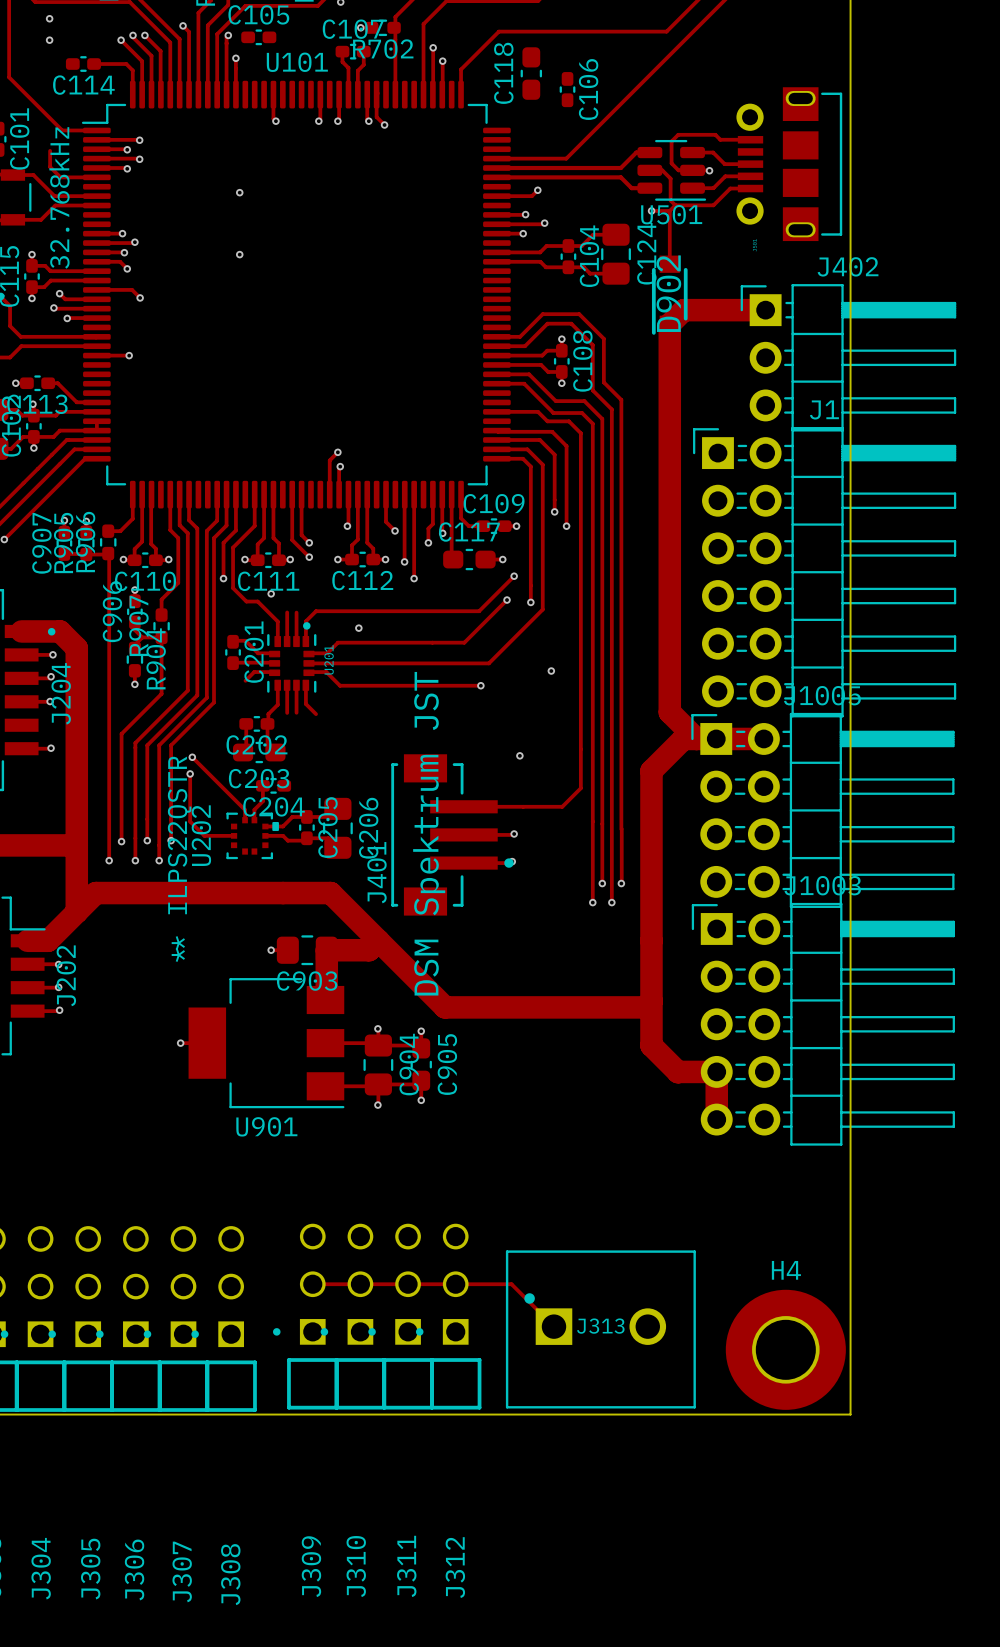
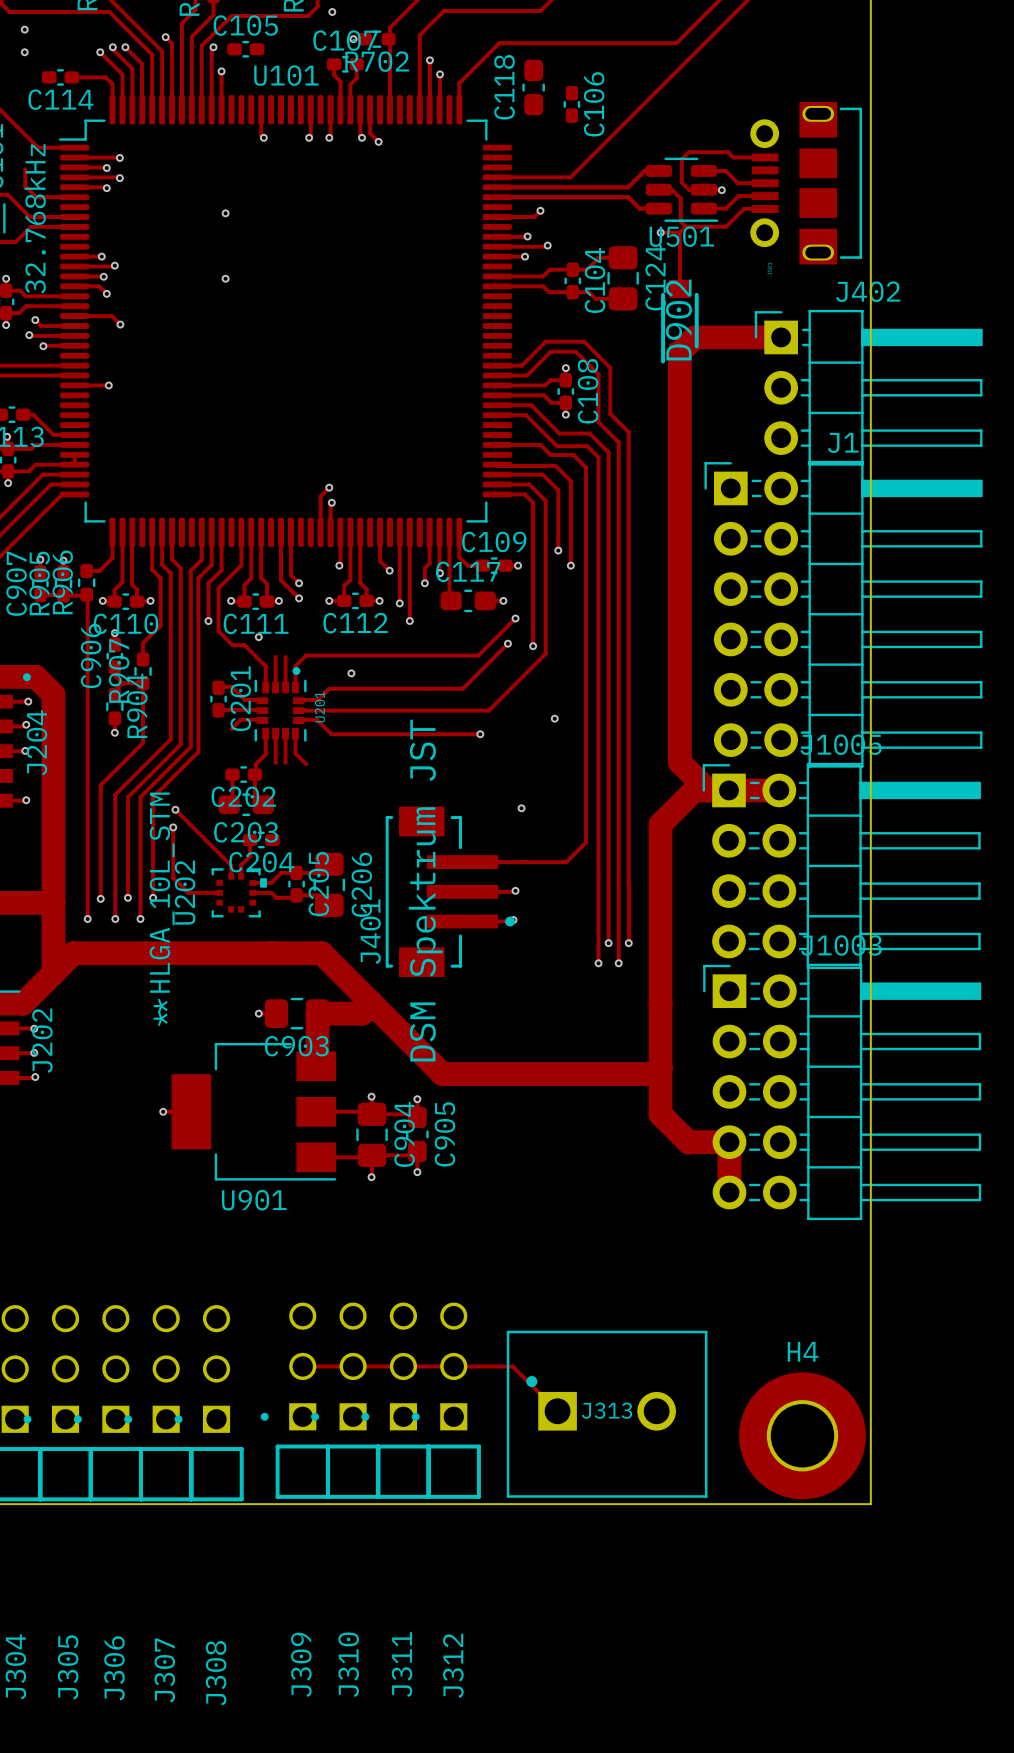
U202 value: ILPS22QSTR (179, 835) -> HLGA_10L_STM (162, 892)

